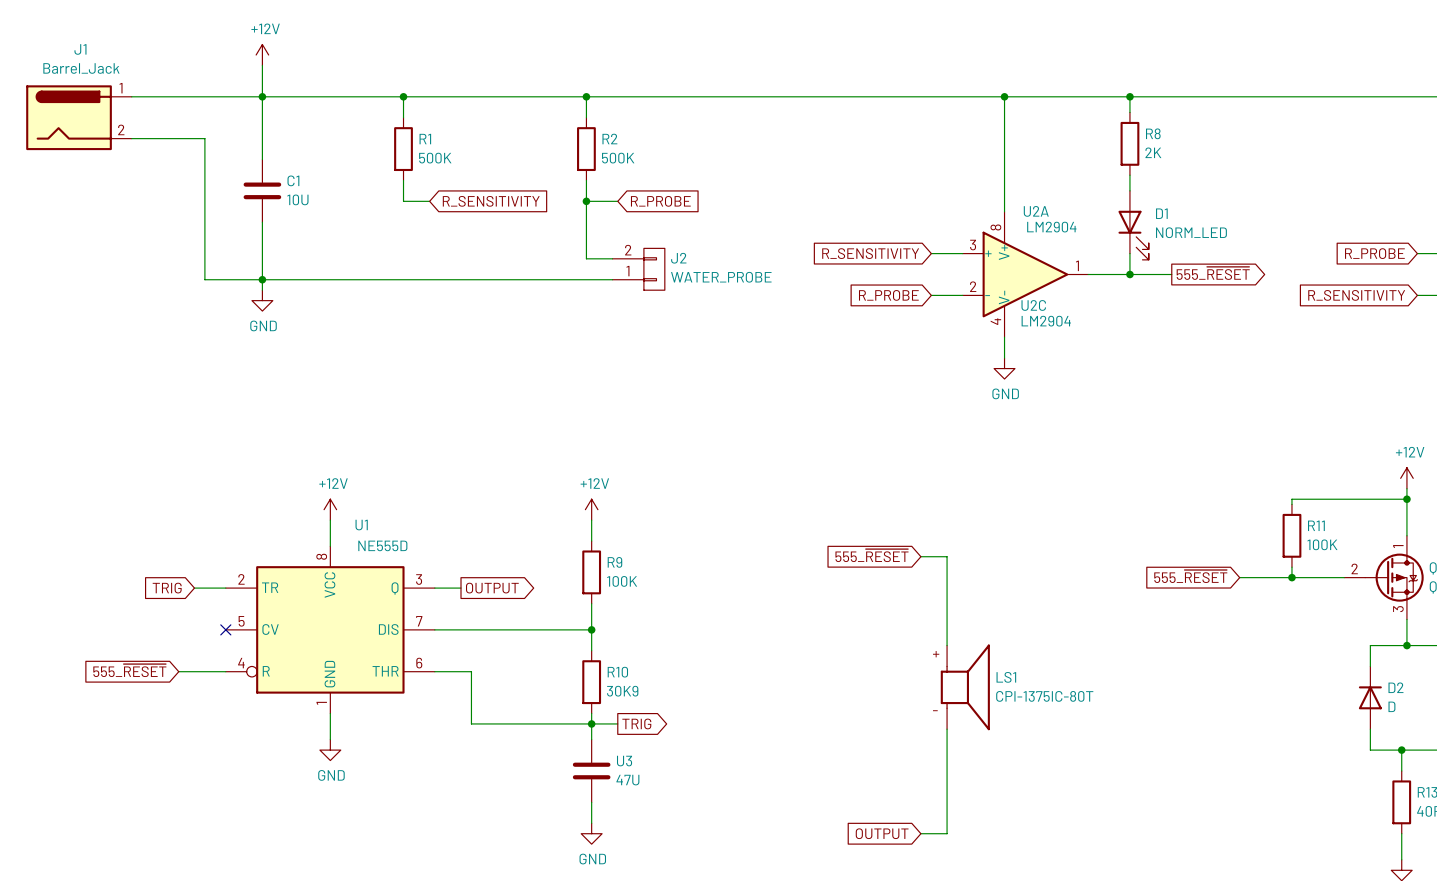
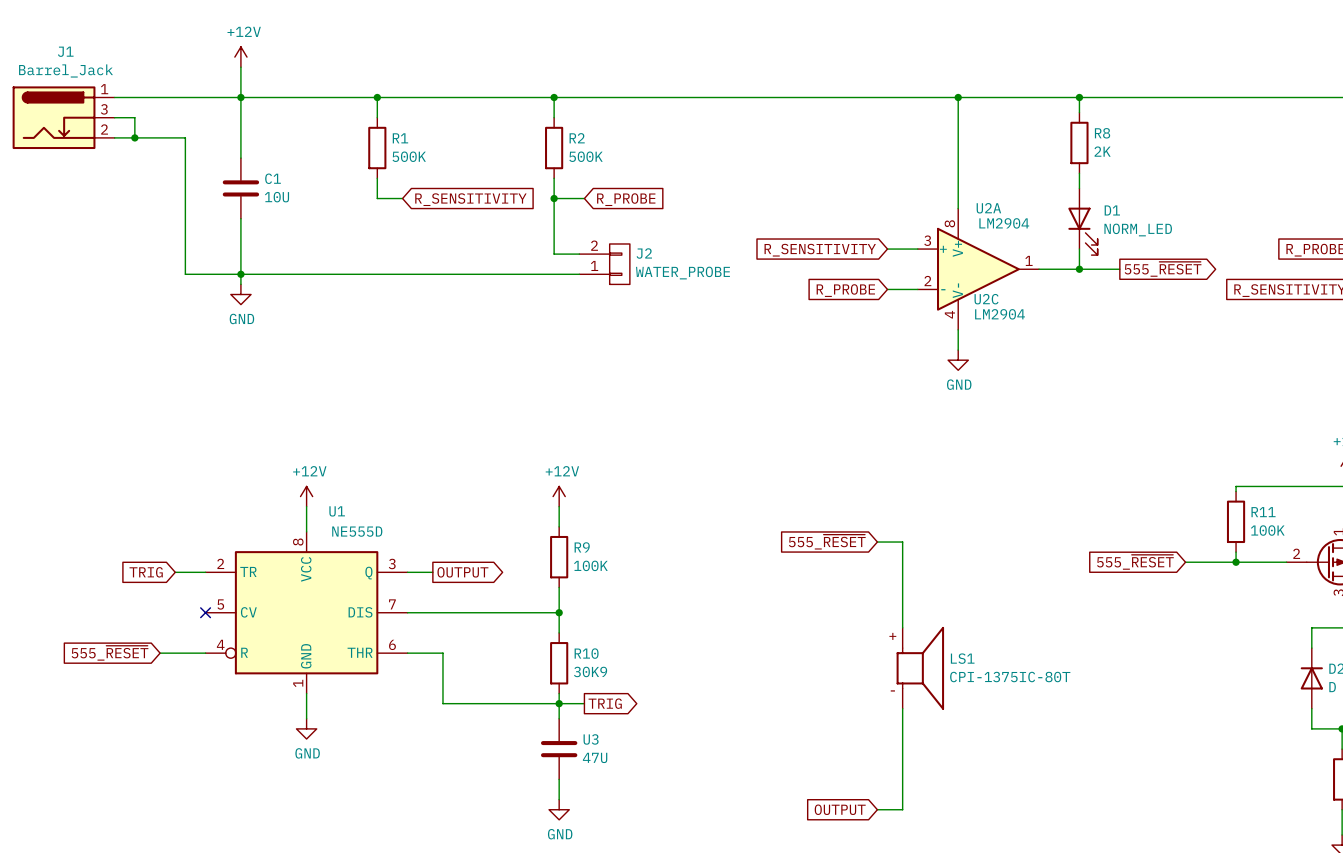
J1 symbol: [26, 85, 132, 151] -> [12, 86, 115, 150]
wire: none -> (114, 117) (134, 117) (134, 137)
junction: none -> (134, 137)

